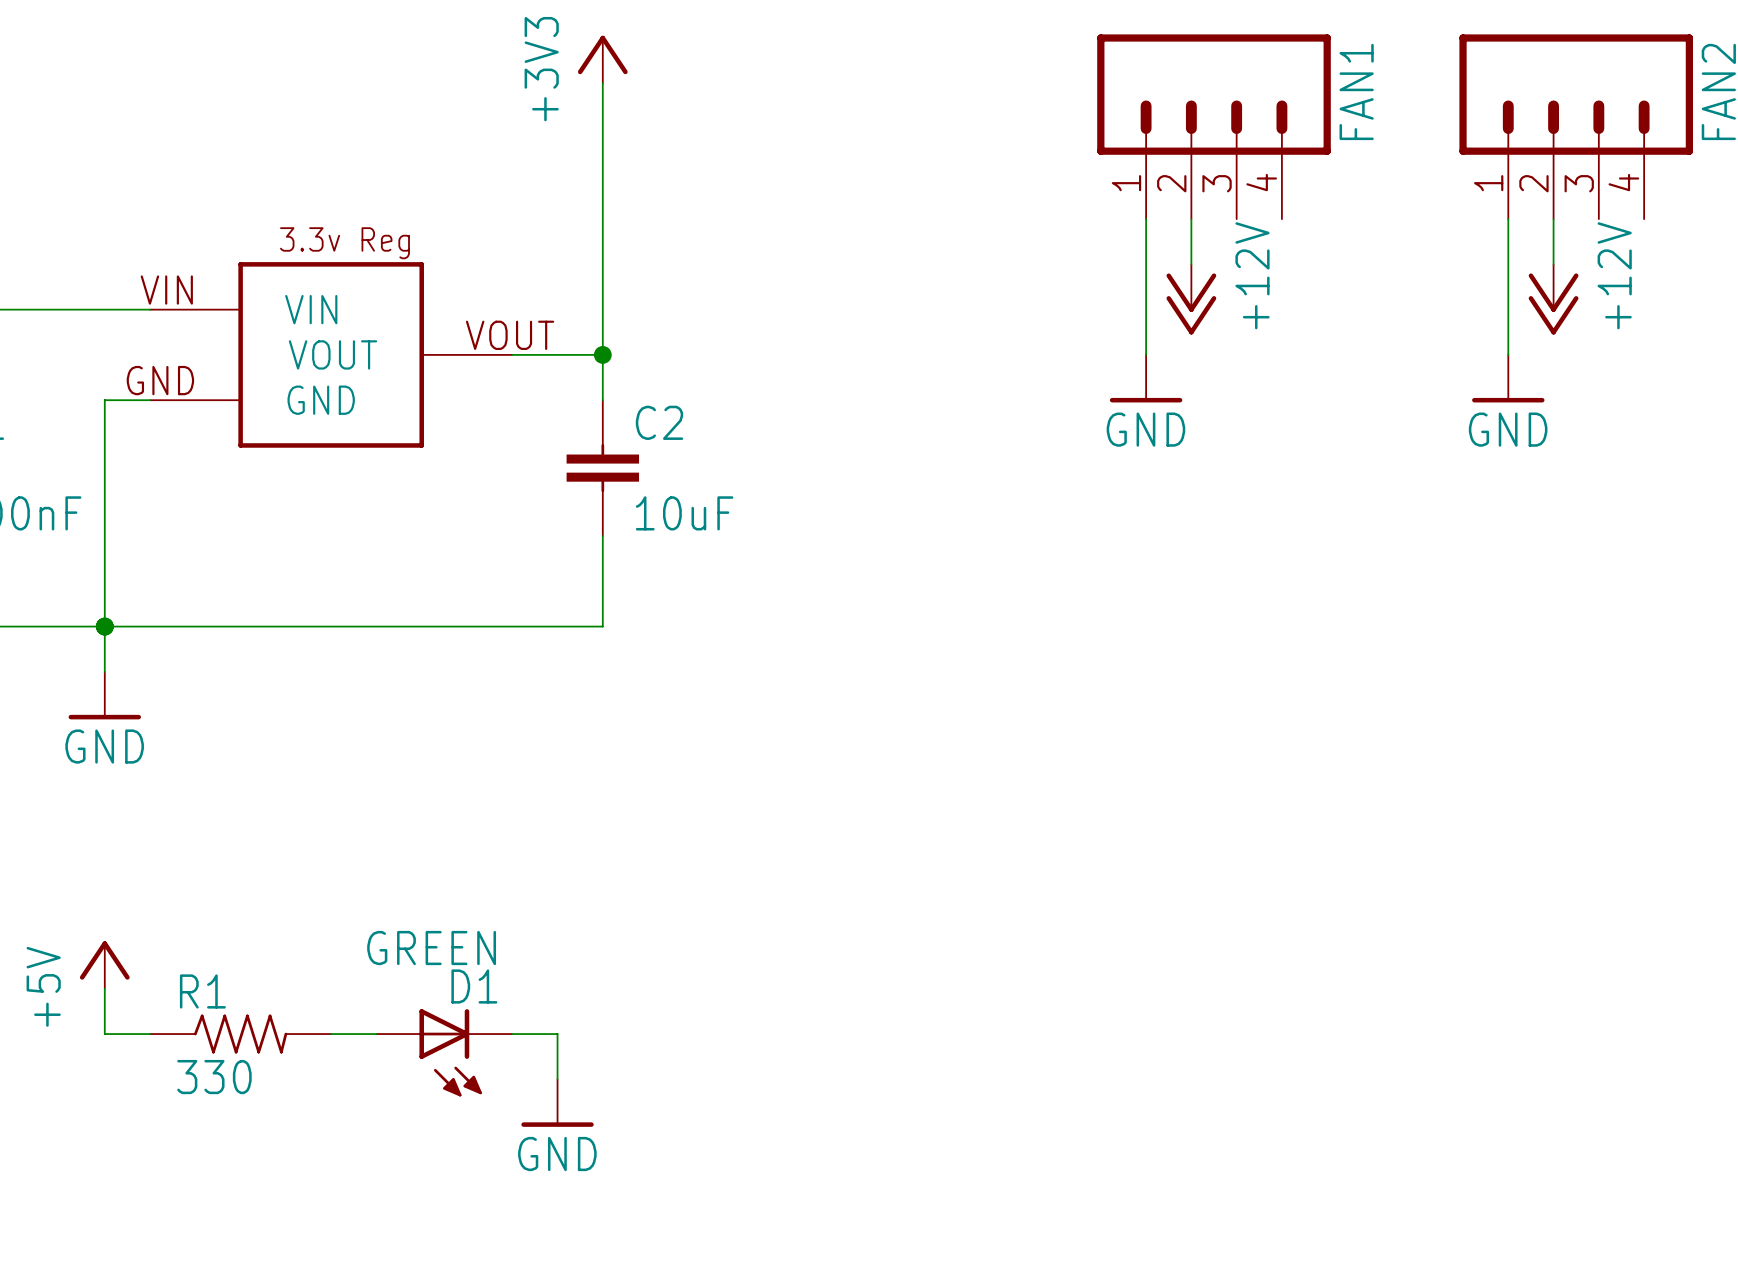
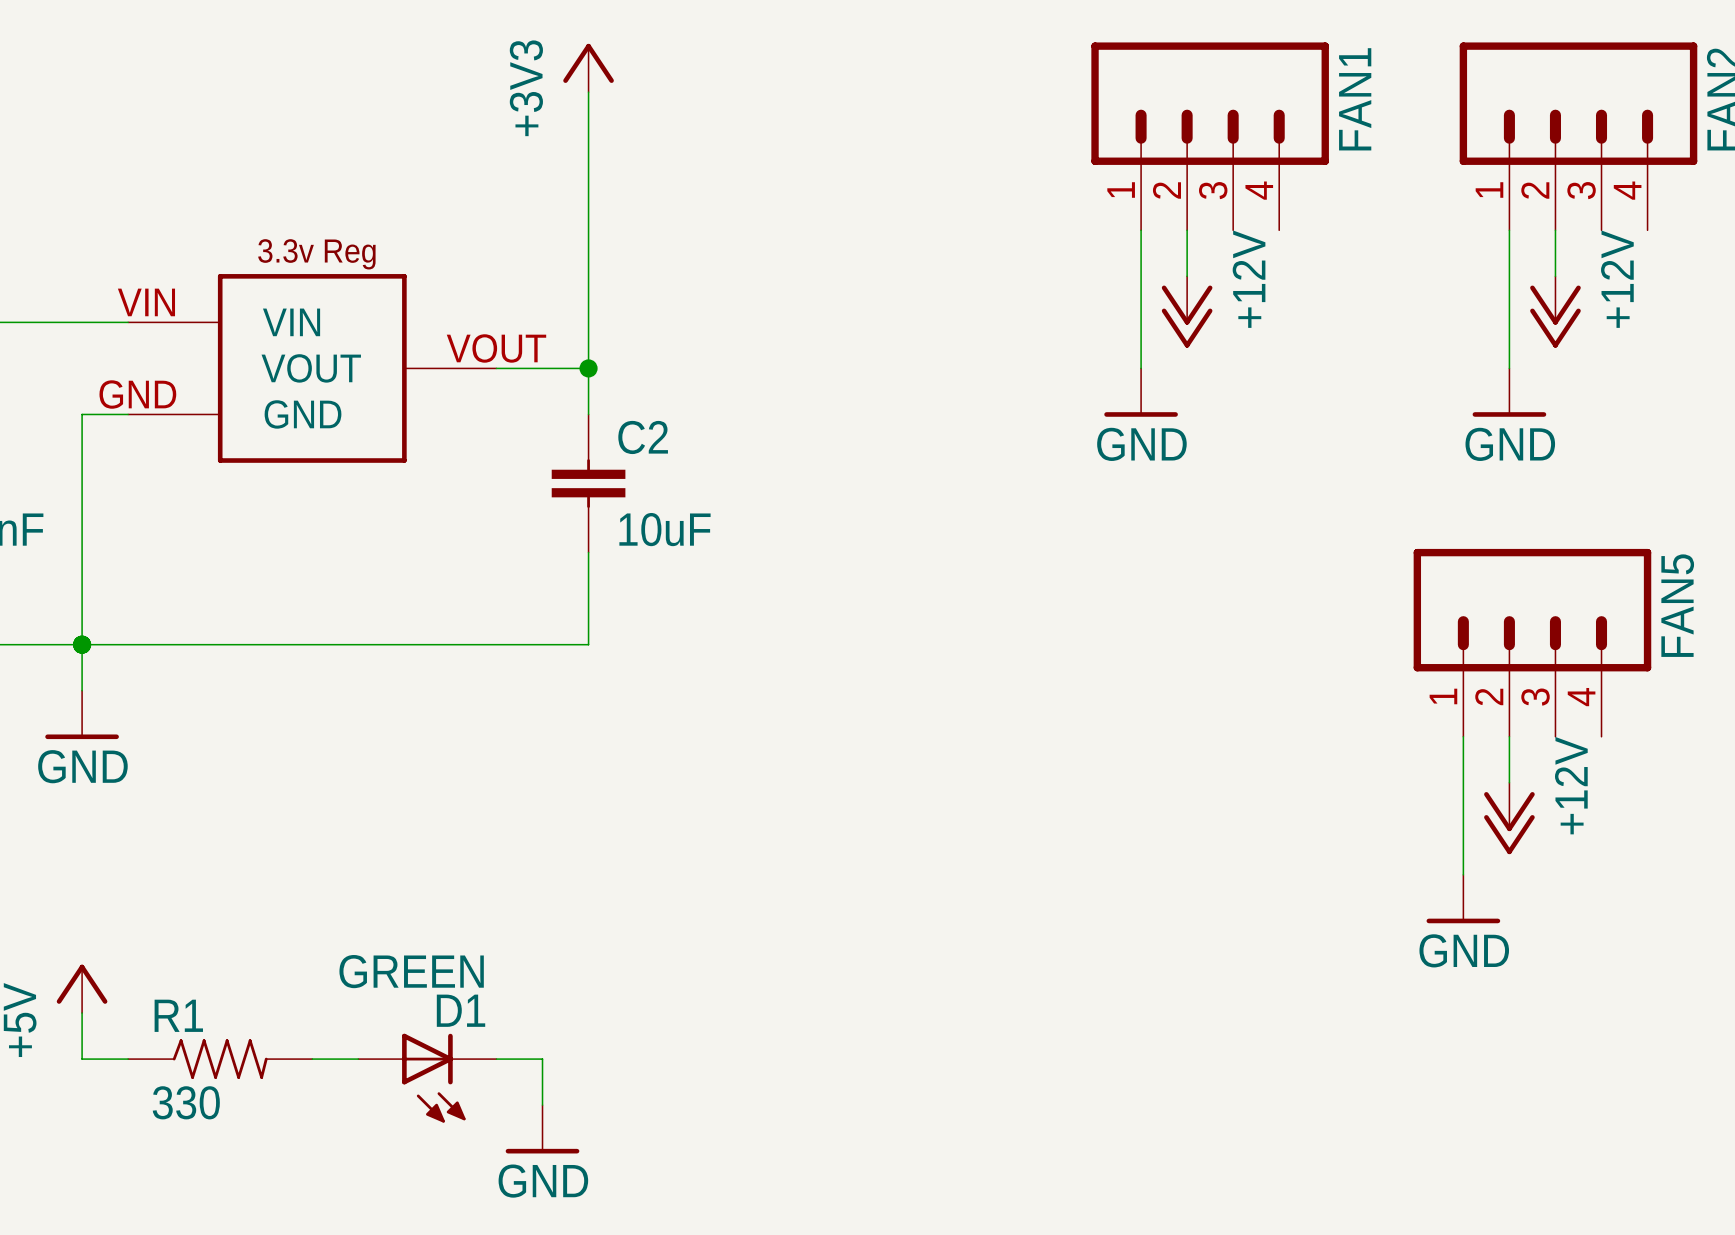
FAN5: none -> (1532, 642)
wire: none -> (1463, 736) (1463, 874)
wire: none -> (1509, 736) (1509, 782)
power symbol: none -> +12V (1509, 818)
power symbol: none -> GND (1463, 899)

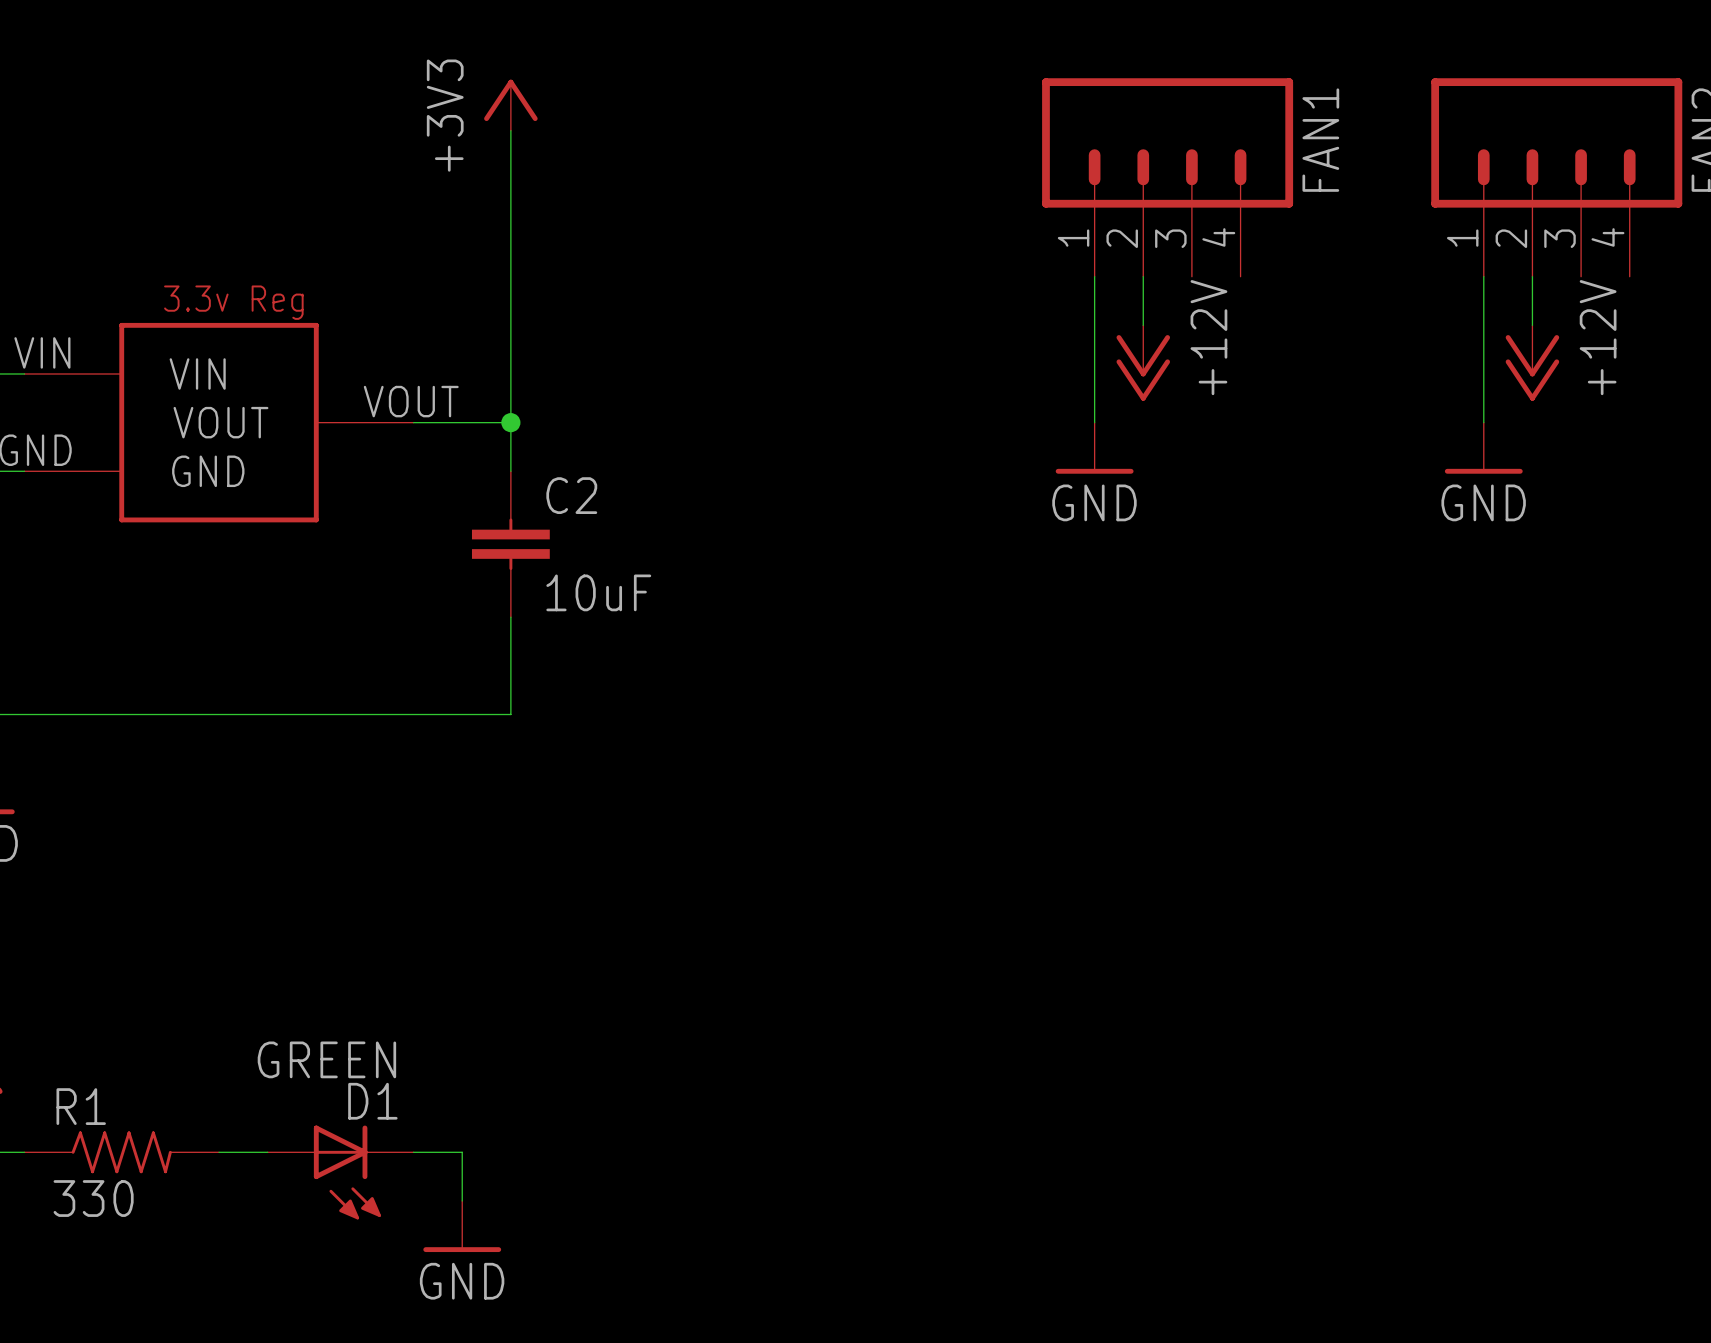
FAN5: (1532, 642) -> none
wire: (1463, 736) (1463, 874) -> none
wire: (1509, 736) (1509, 782) -> none
power symbol: +12V (1509, 818) -> none
power symbol: GND (1463, 899) -> none

